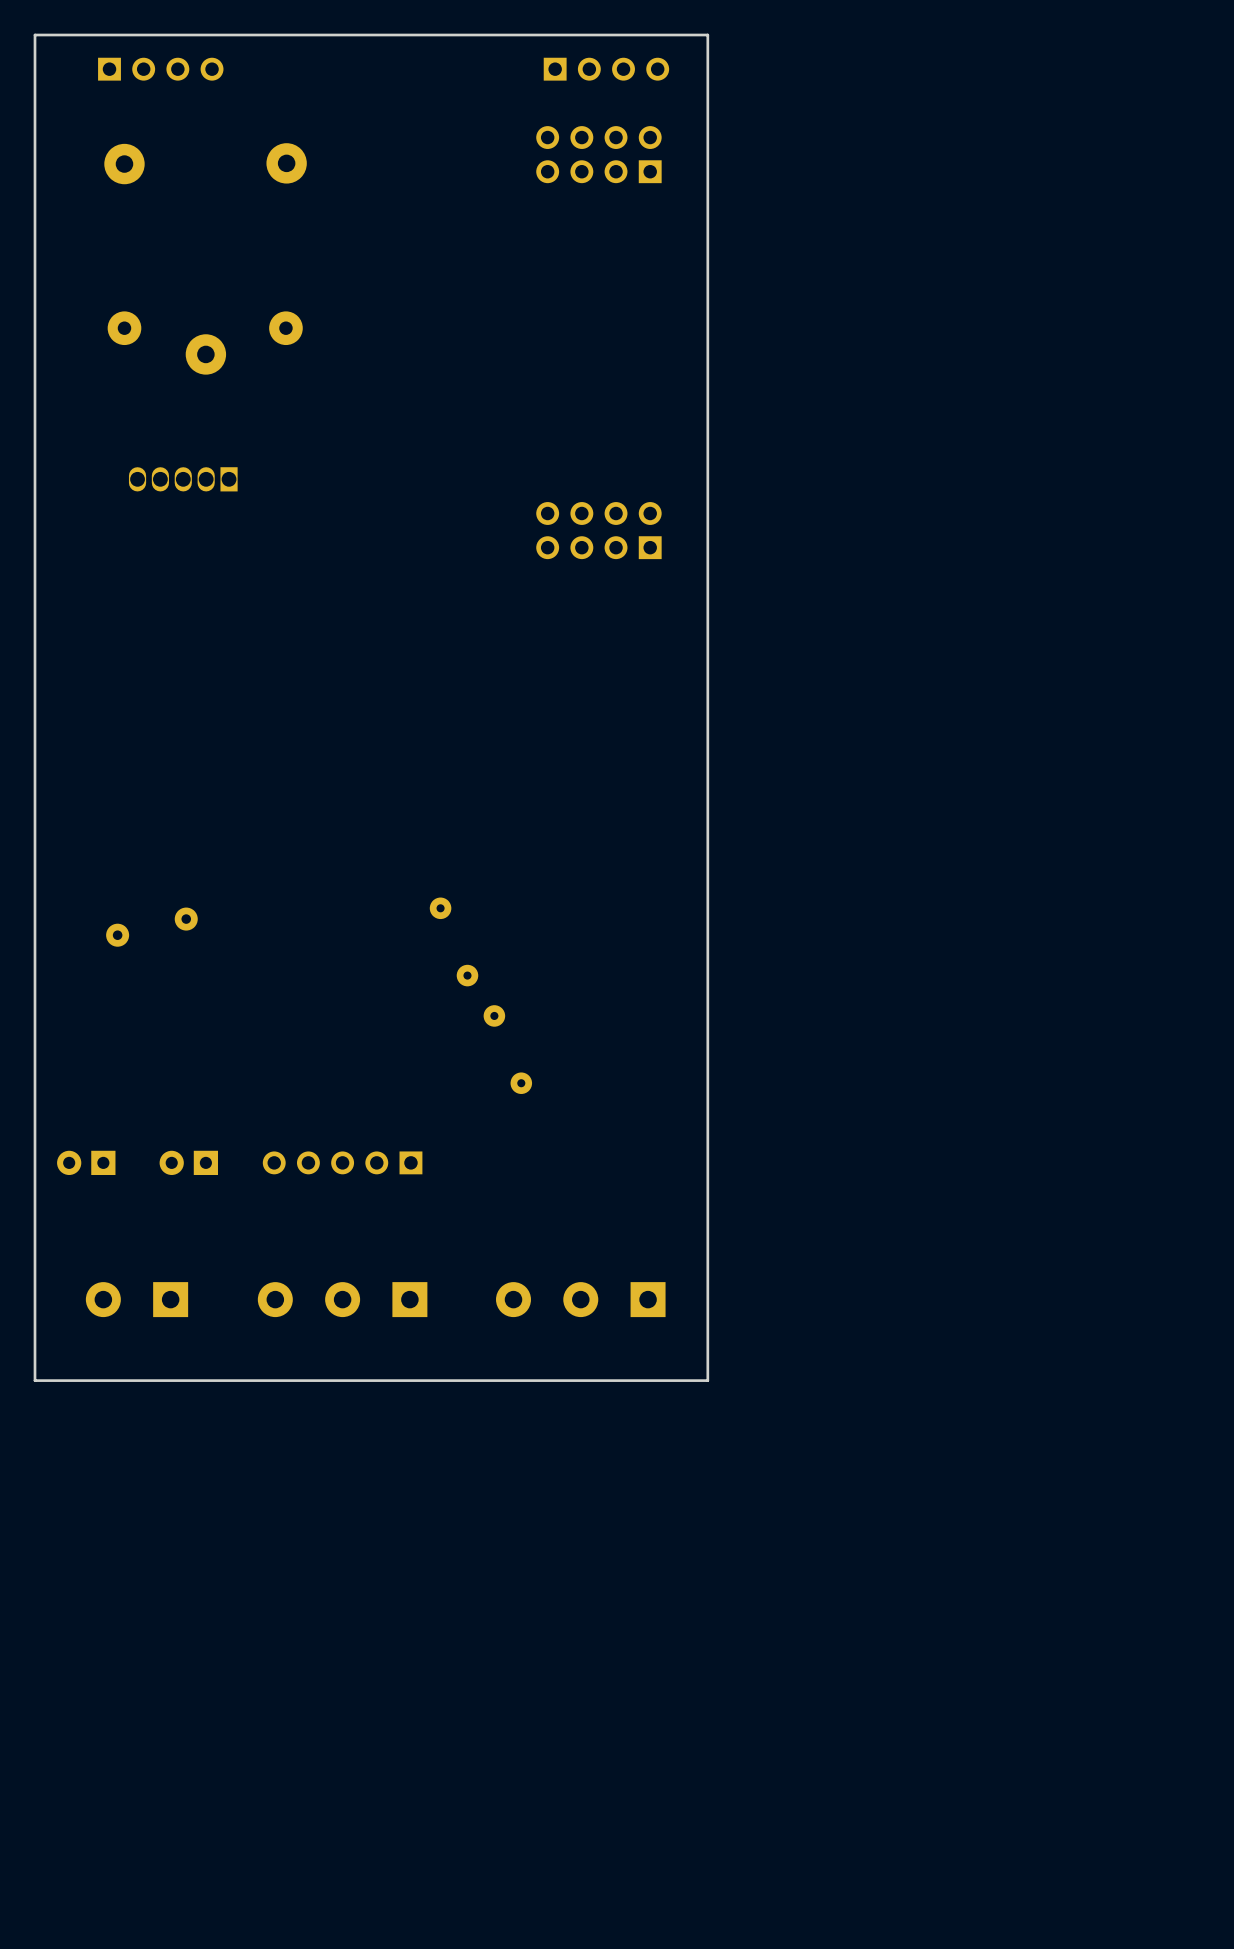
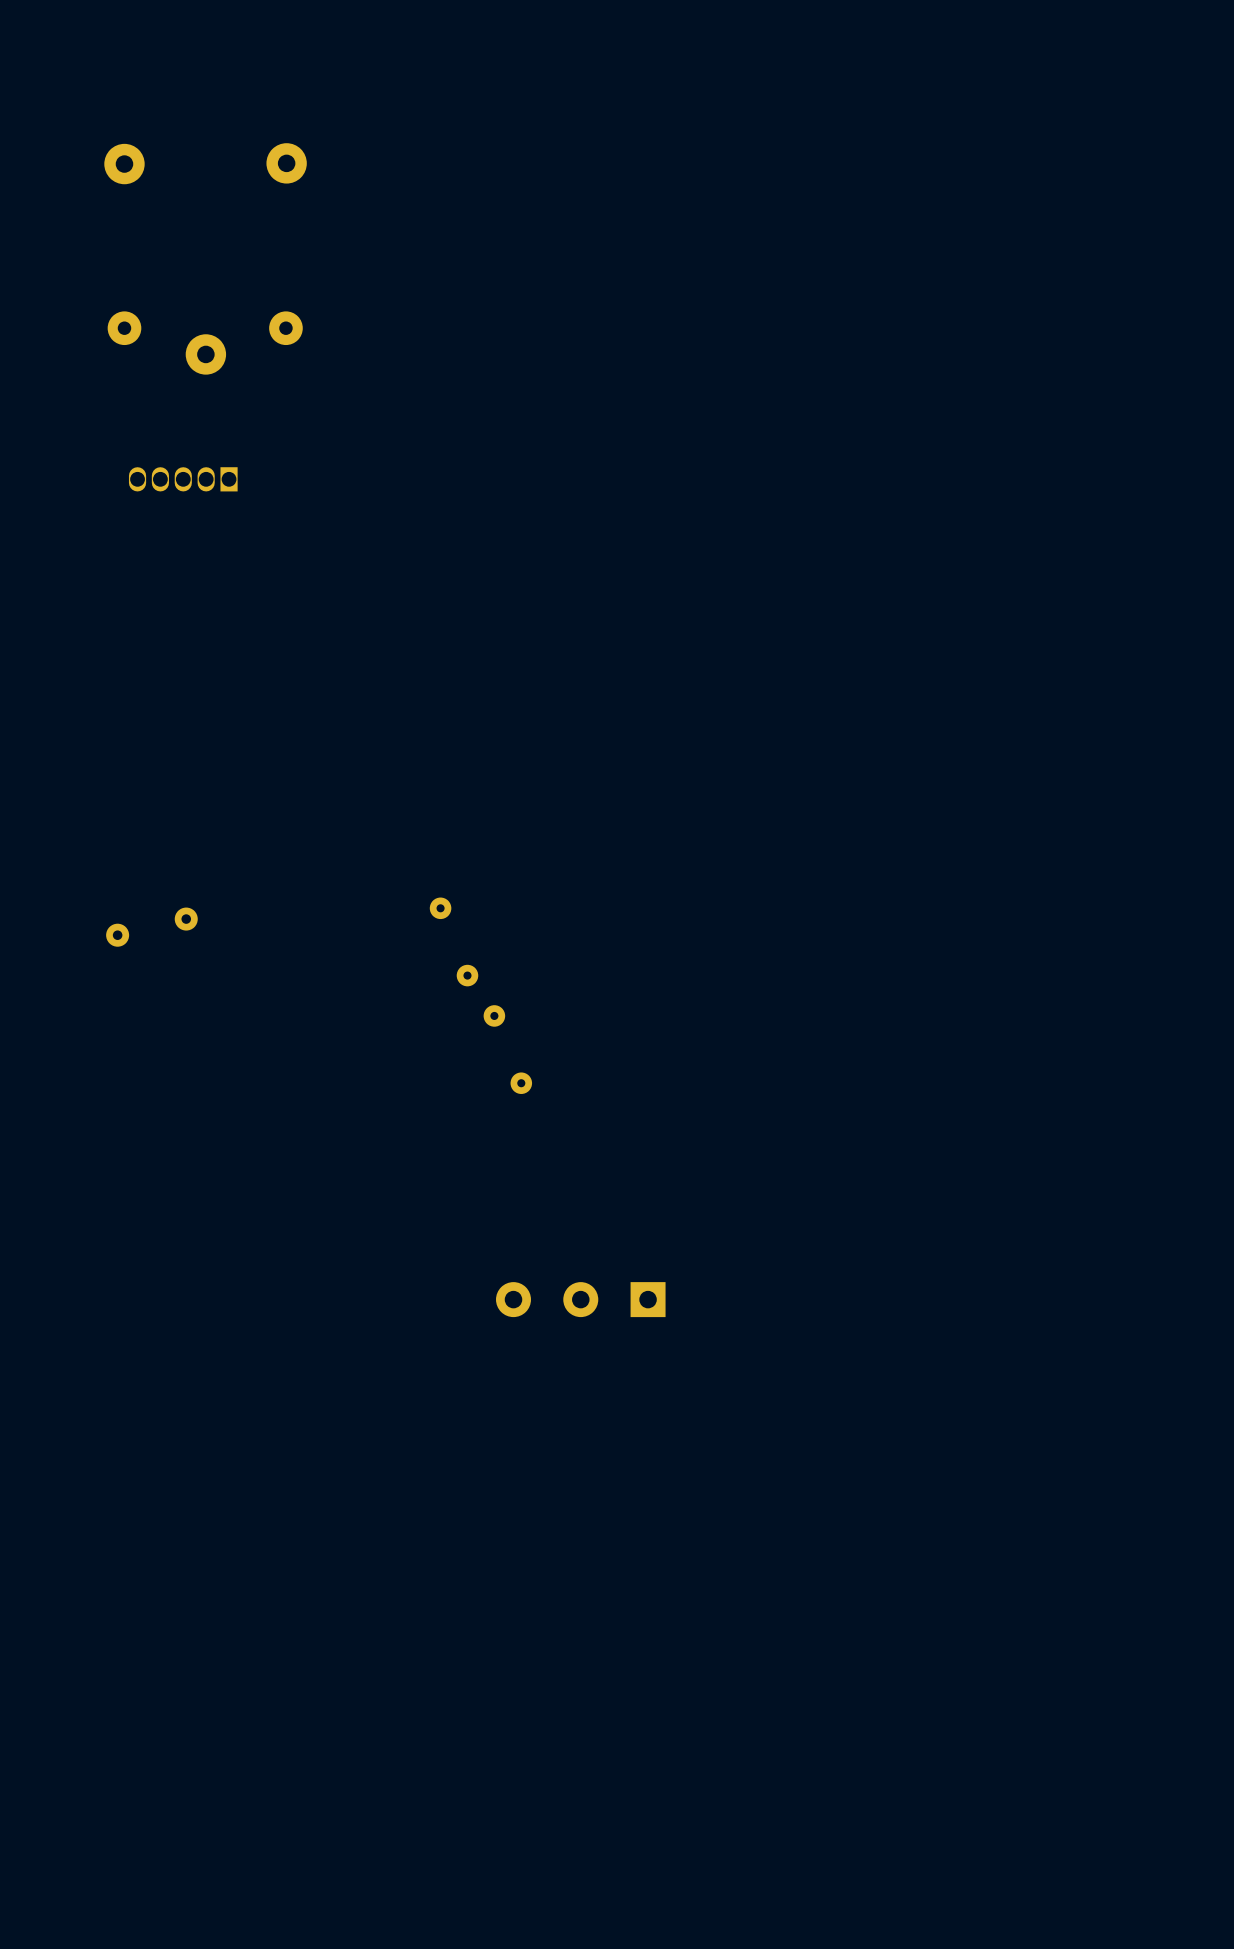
board edge: (707, 35) (35, 35) (35, 1380) (707, 1380) (707, 35) -> none
part: (160, 69) -> none
part: (606, 69) -> none
part: (598, 154) -> none
part: (598, 530) -> none
part: (86, 1162) -> none
part: (188, 1162) -> none
part: (342, 1162) -> none
part: (137, 1299) -> none
part: (342, 1299) -> none

